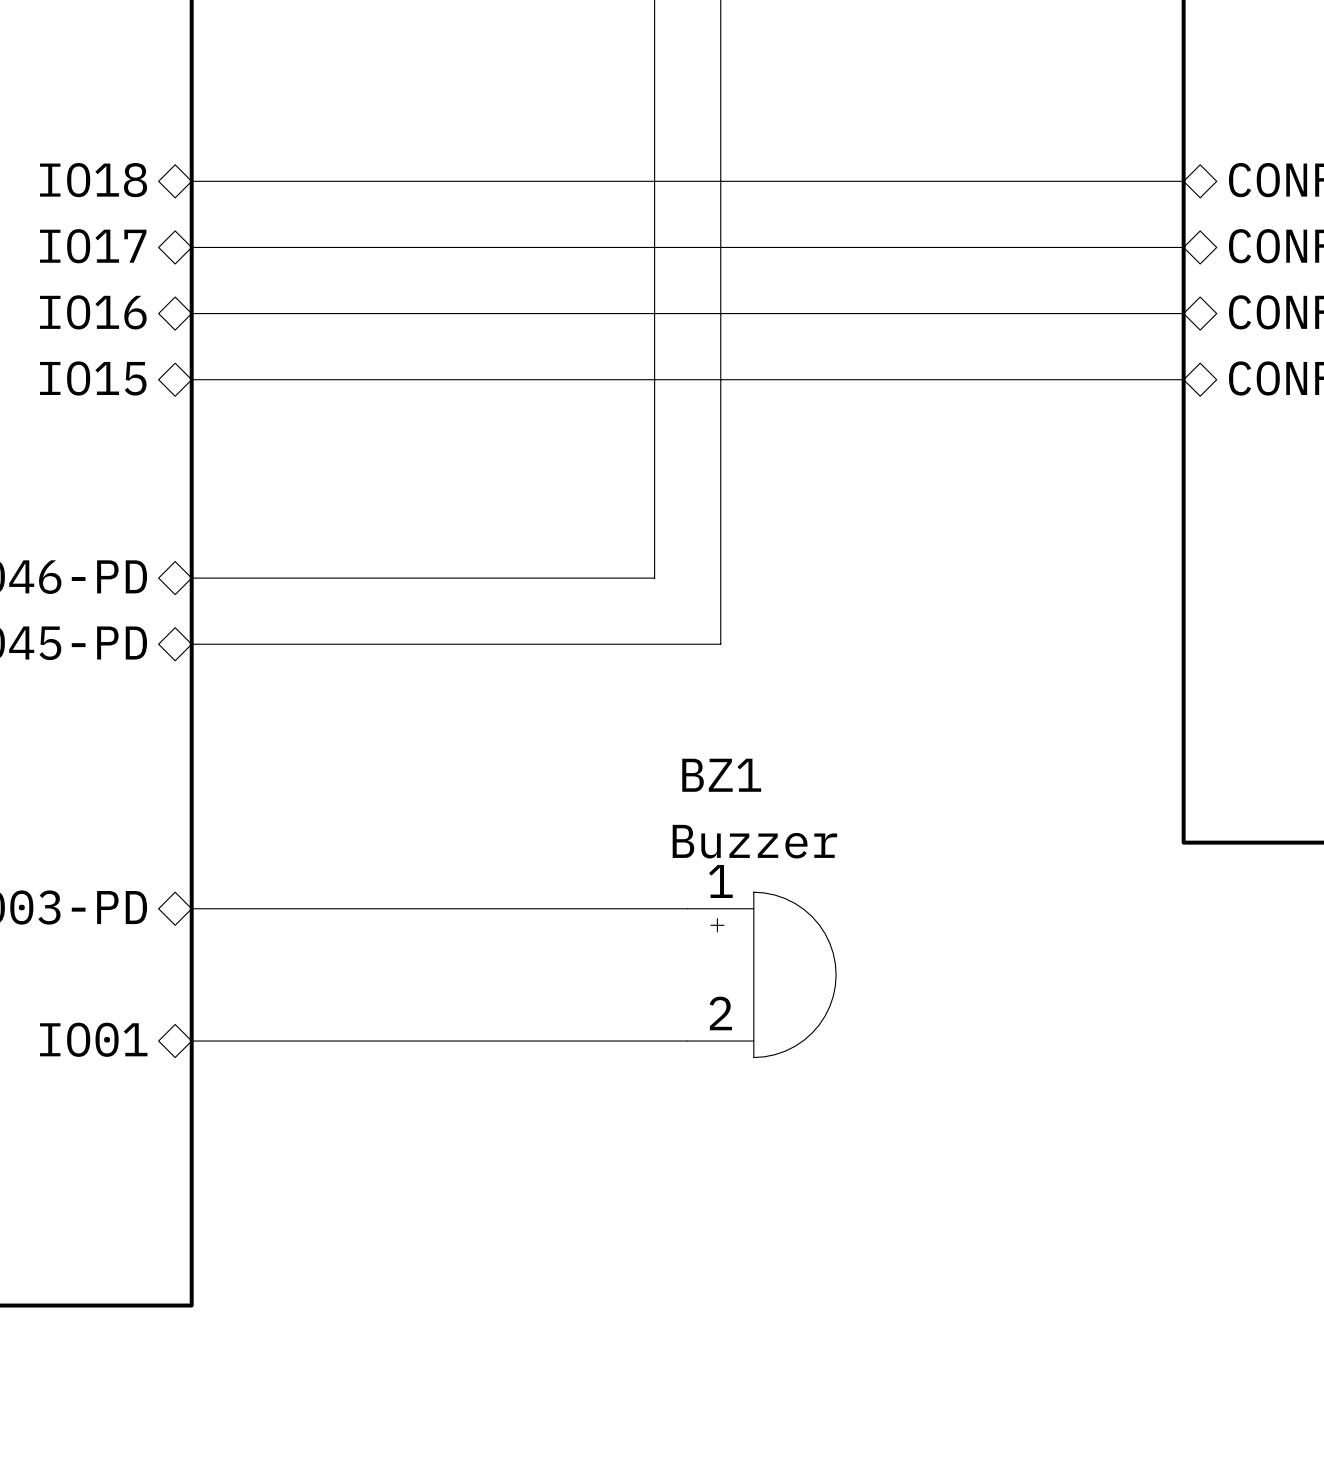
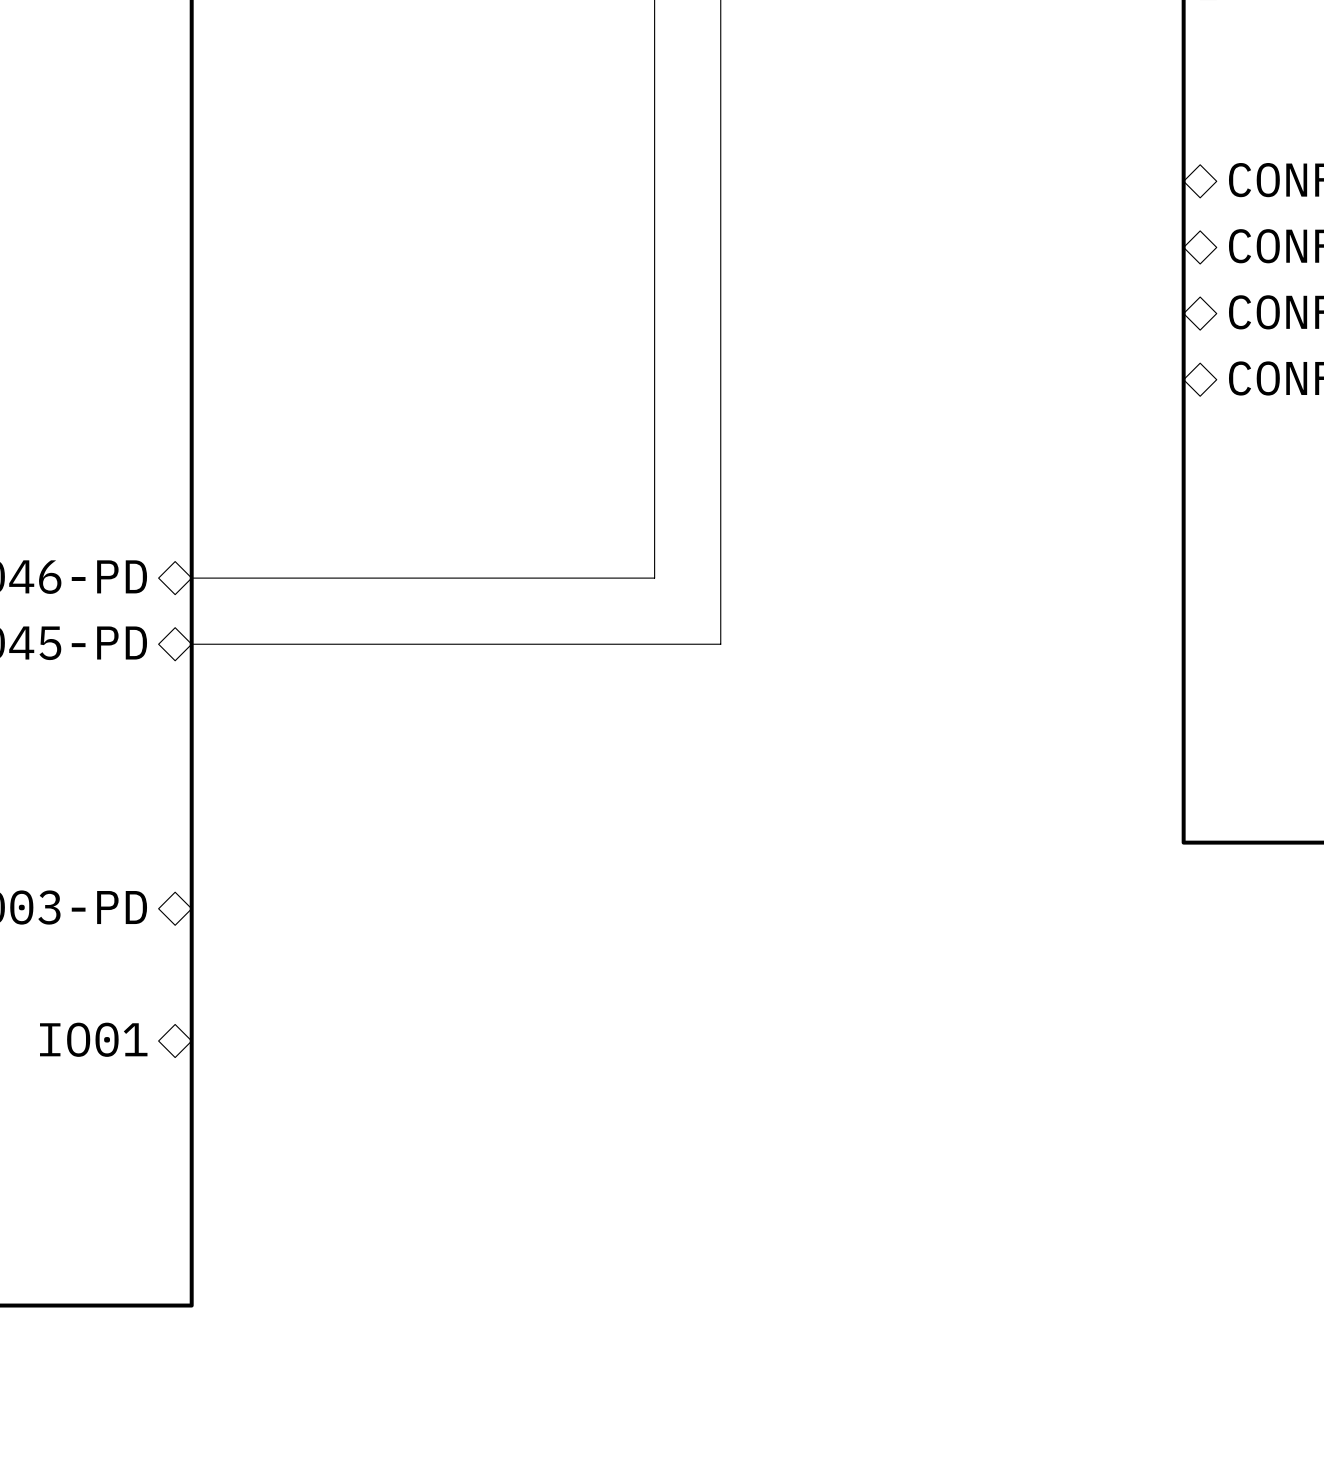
sheet pin: IO18 (93, 180) -> none
wire: (191, 181) (1183, 181) -> none
sheet pin: IO17 (93, 246) -> none
wire: (191, 247) (1183, 247) -> none
sheet pin: IO16 (93, 312) -> none
wire: (191, 313) (1183, 313) -> none
sheet pin: IO15 (93, 378) -> none
wire: (191, 379) (1183, 379) -> none
wire: (191, 908) (687, 908) -> none
BZ1: Buzzer (761, 974) -> none
wire: (191, 1041) (687, 1041) -> none

